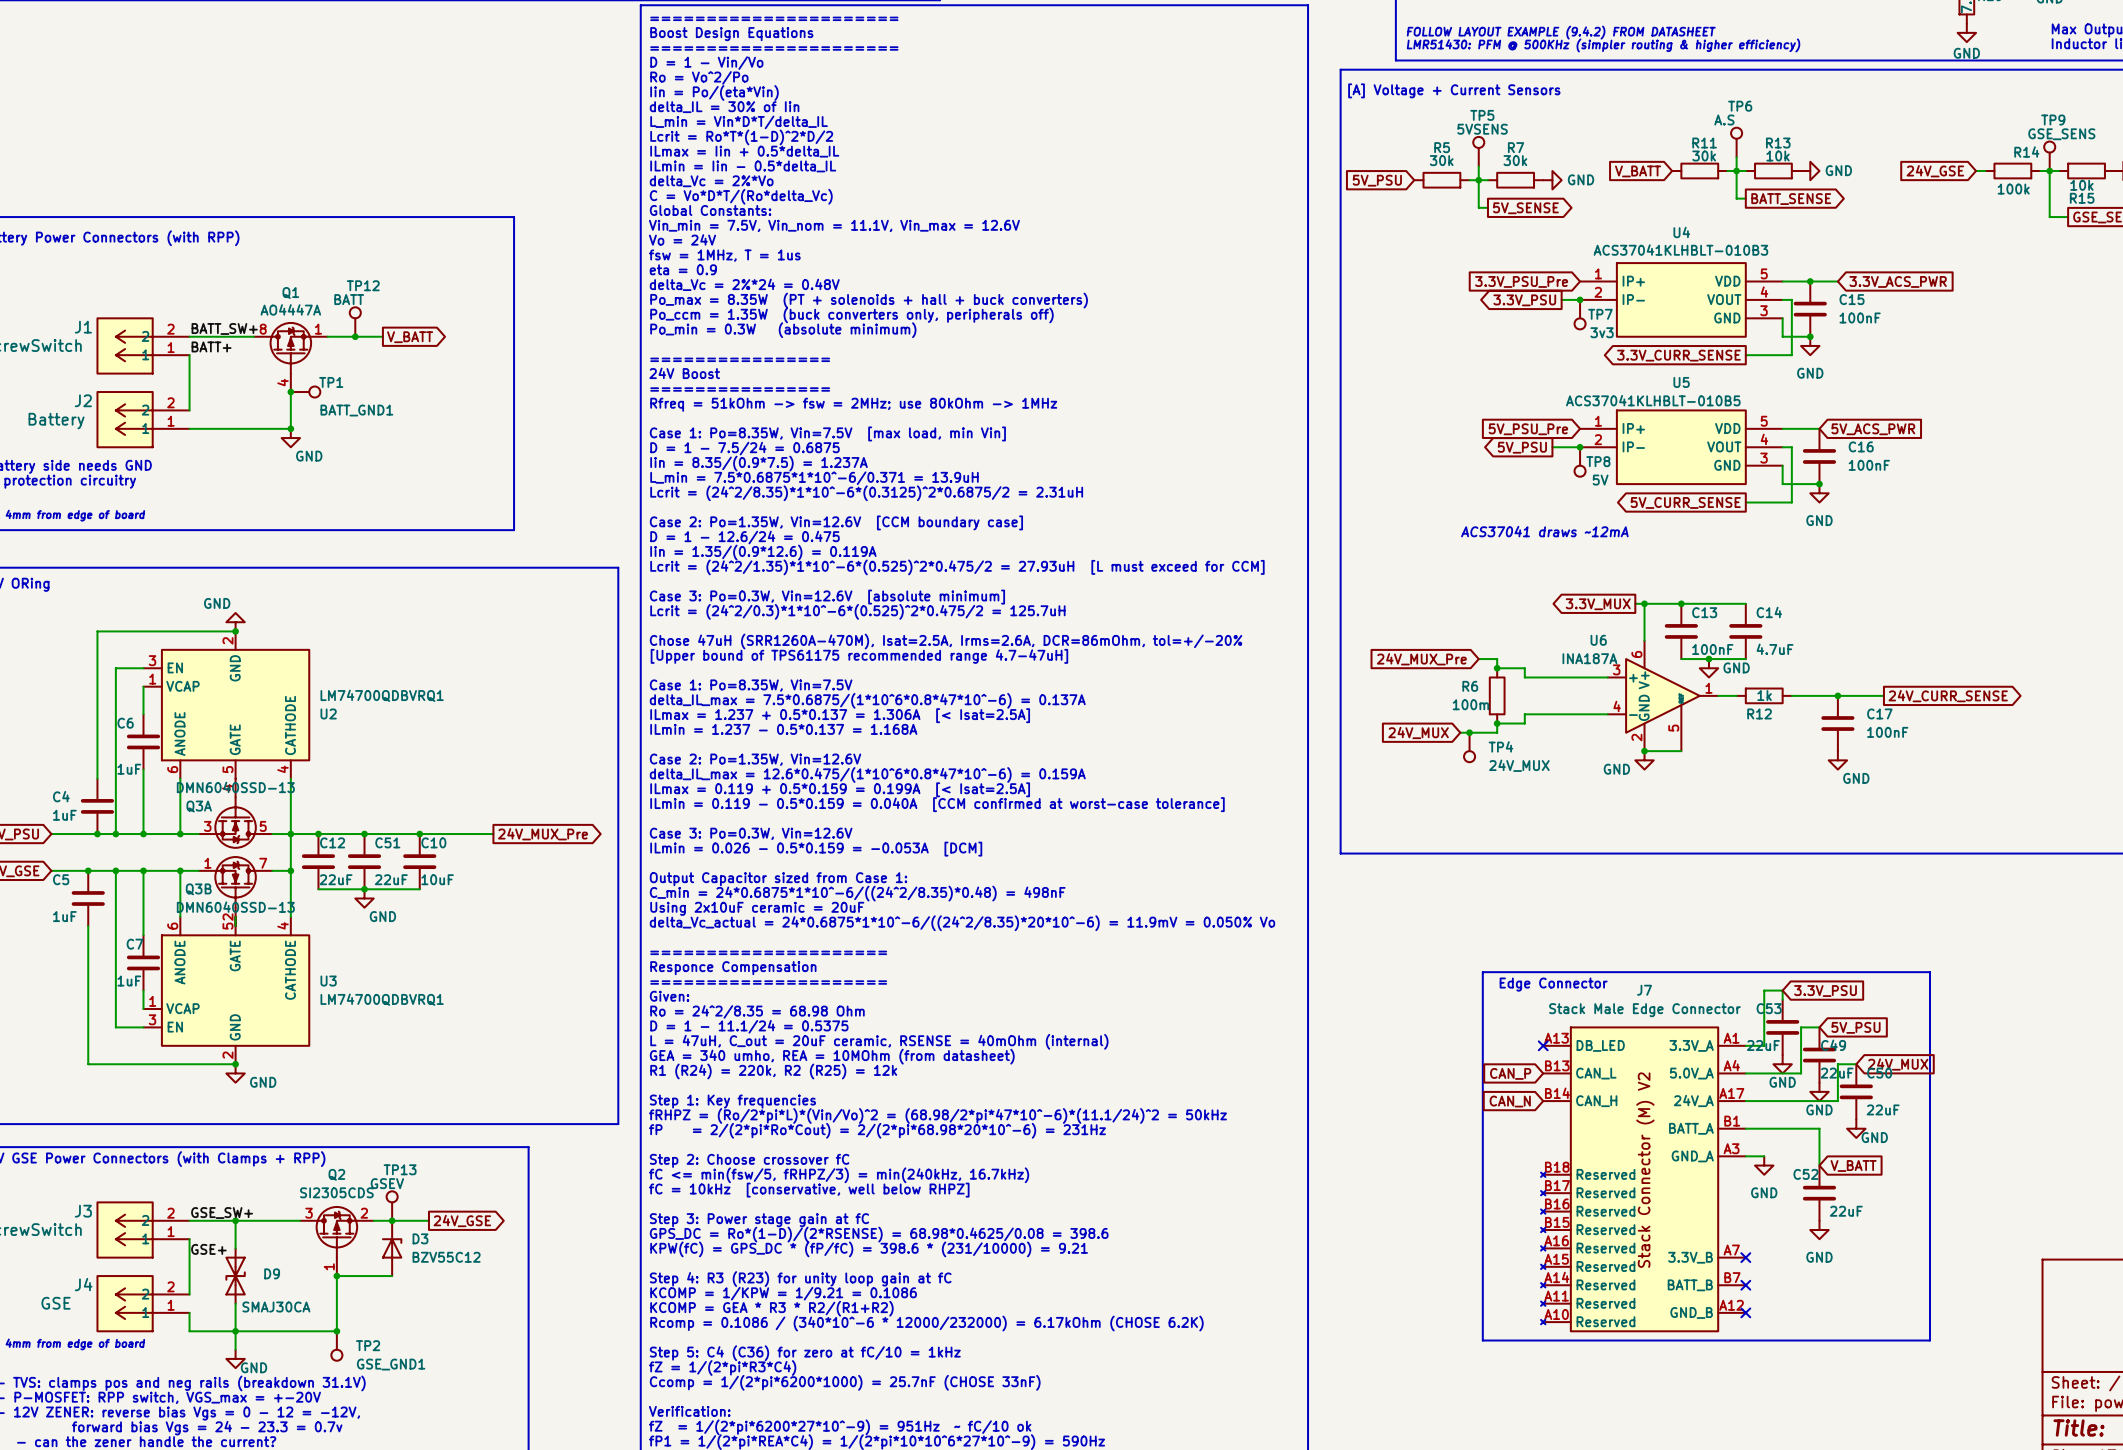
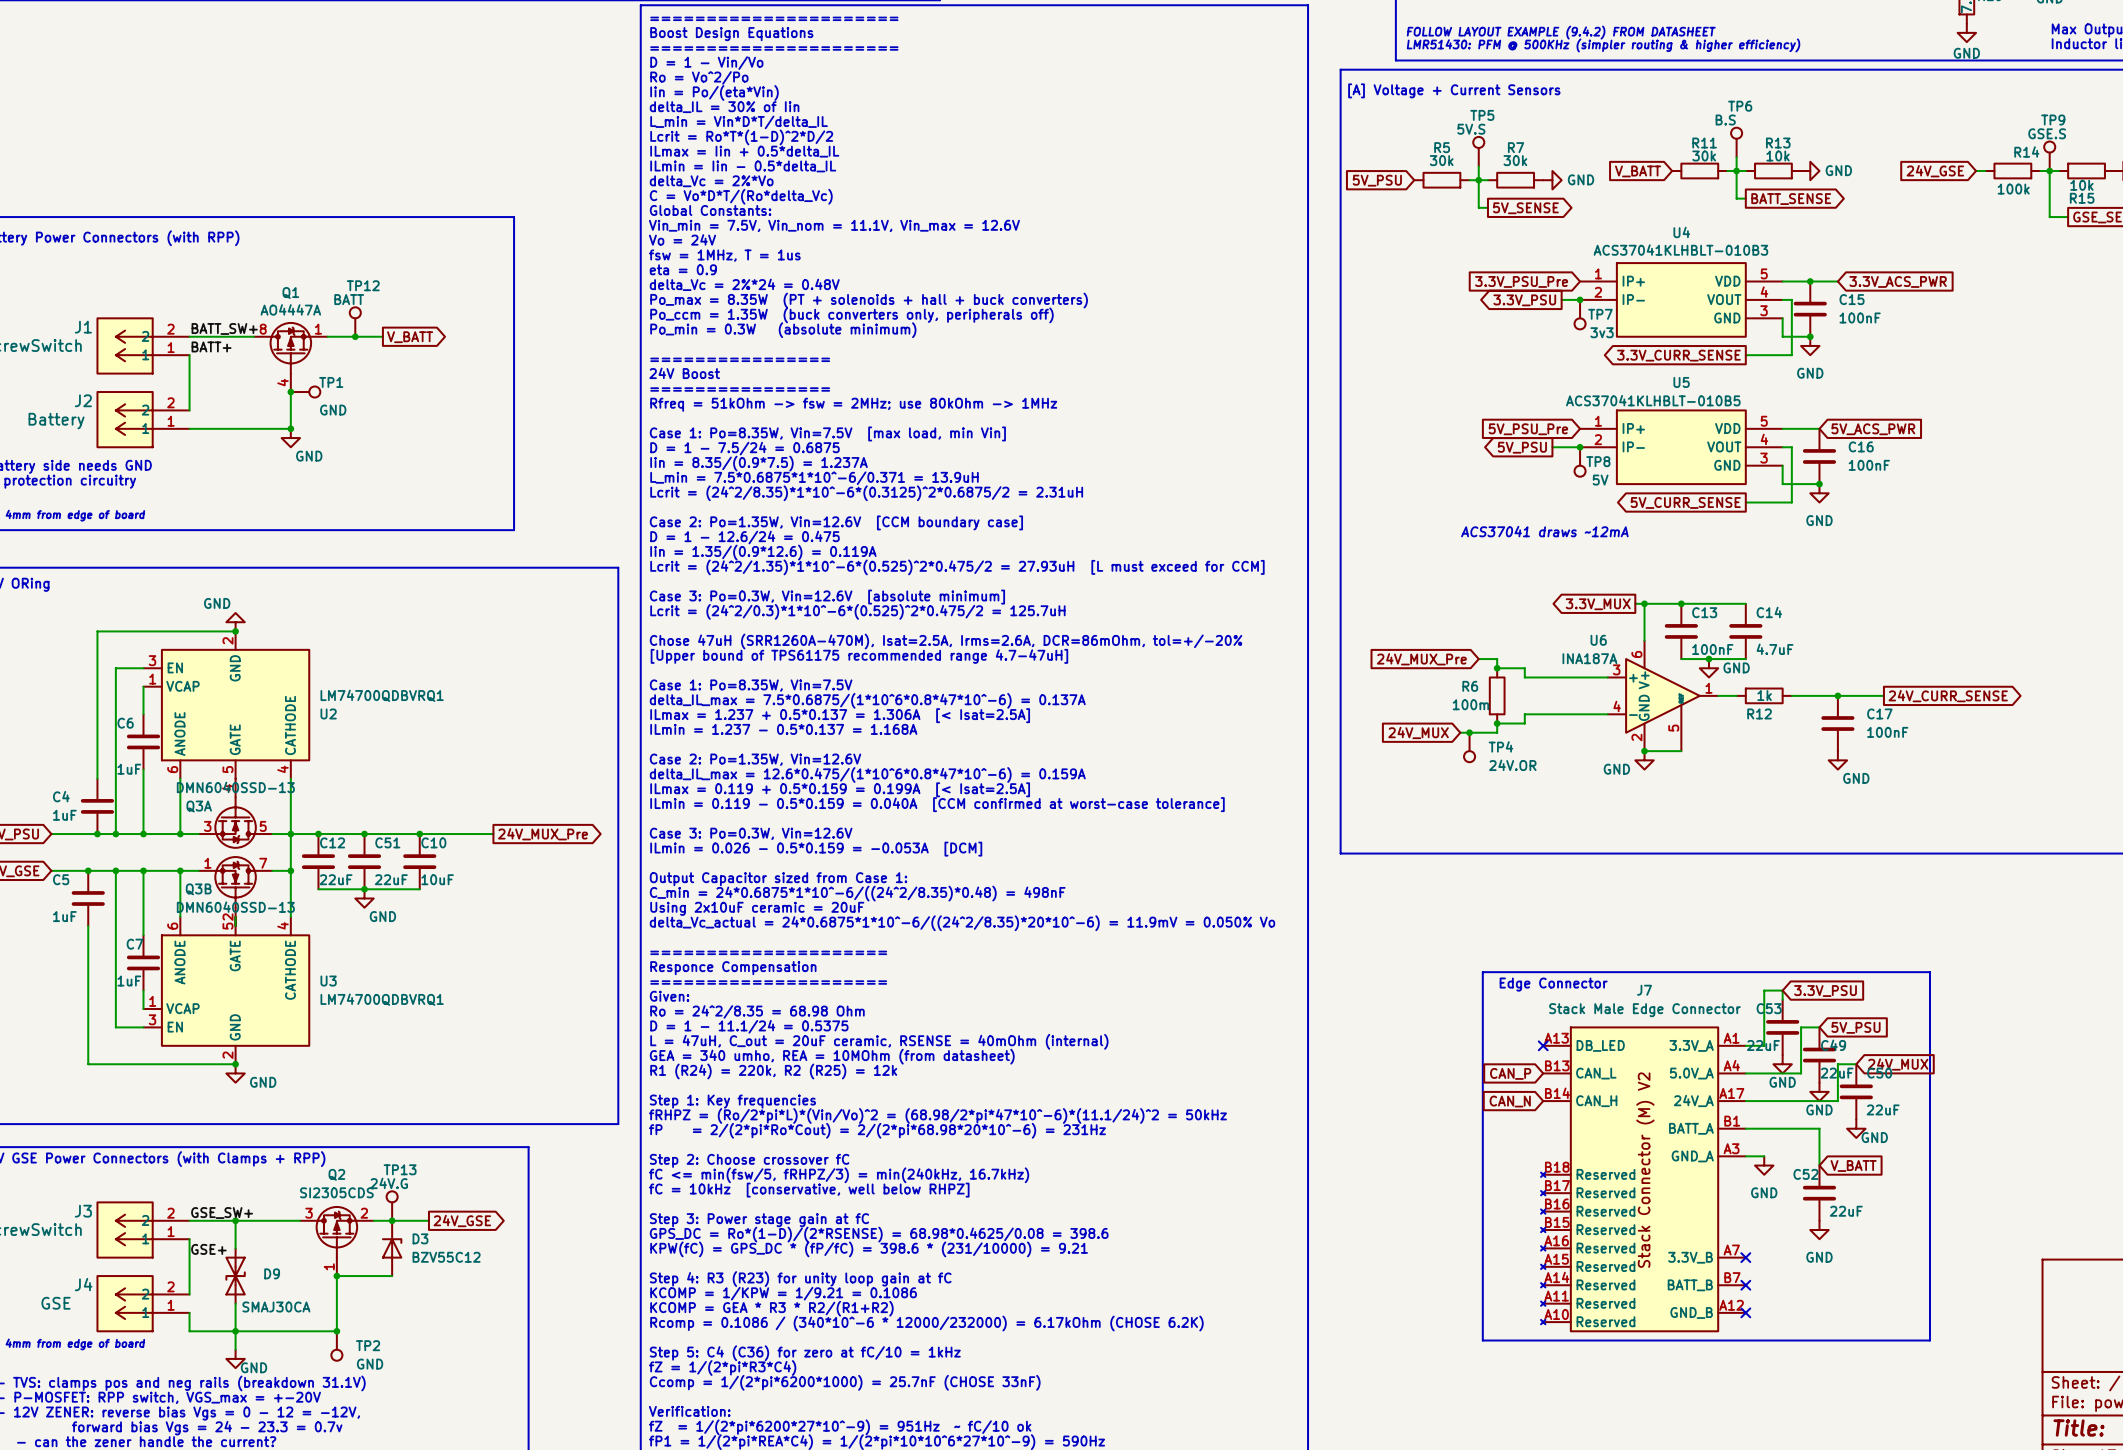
TP6 value: A.S (1724, 120) -> B.S (1725, 120)
TP5 value: 5VSENS (1482, 129) -> 5V.S (1471, 129)
TP9 value: GSE_SENS (2061, 134) -> GSE.S (2047, 133)
TP1 value: BATT_GND1 (356, 410) -> GND (333, 410)
TP4 value: 24V_MUX (1519, 765) -> 24V.OR (1512, 765)
TP13 value: GSEV (387, 1183) -> 24V.G (389, 1183)
TP2 value: GSE_GND1 (391, 1364) -> GND (370, 1364)

